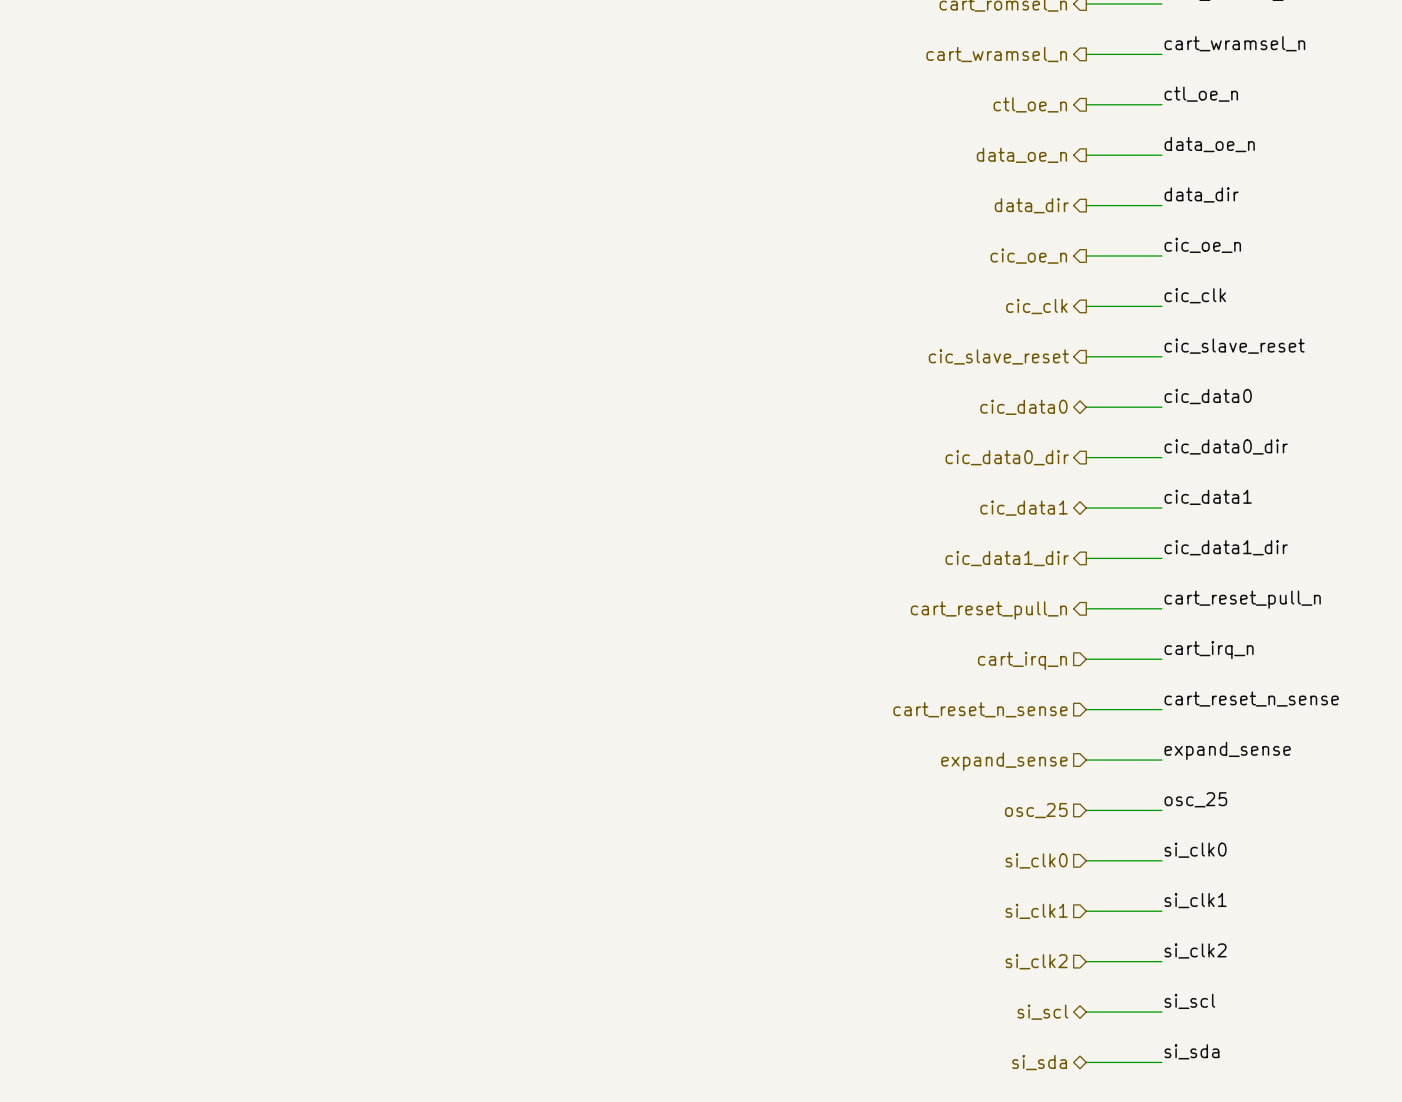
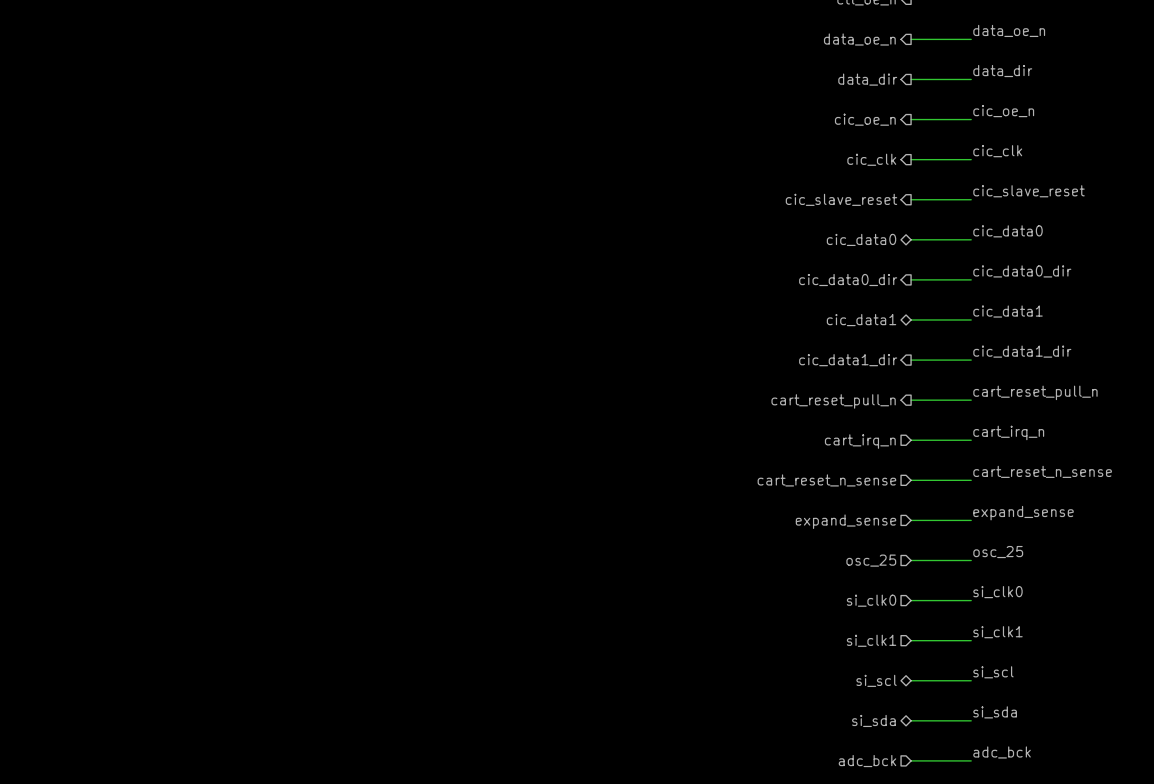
label: si_clk2 (1195, 950) -> si_scl (993, 672)
hierarchical label shape: input (1036, 961) -> bidirectional (876, 680)
hierarchical label: si_clk2 (1036, 961) -> si_scl (876, 680)
label: si_scl (1189, 1001) -> si_sda (995, 712)
hierarchical label: si_scl (1042, 1012) -> si_sda (873, 720)
label: si_sda (1191, 1051) -> adc_bck (1002, 752)
hierarchical label shape: bidirectional (1039, 1062) -> input (867, 761)
hierarchical label: si_sda (1039, 1062) -> adc_bck (867, 761)

